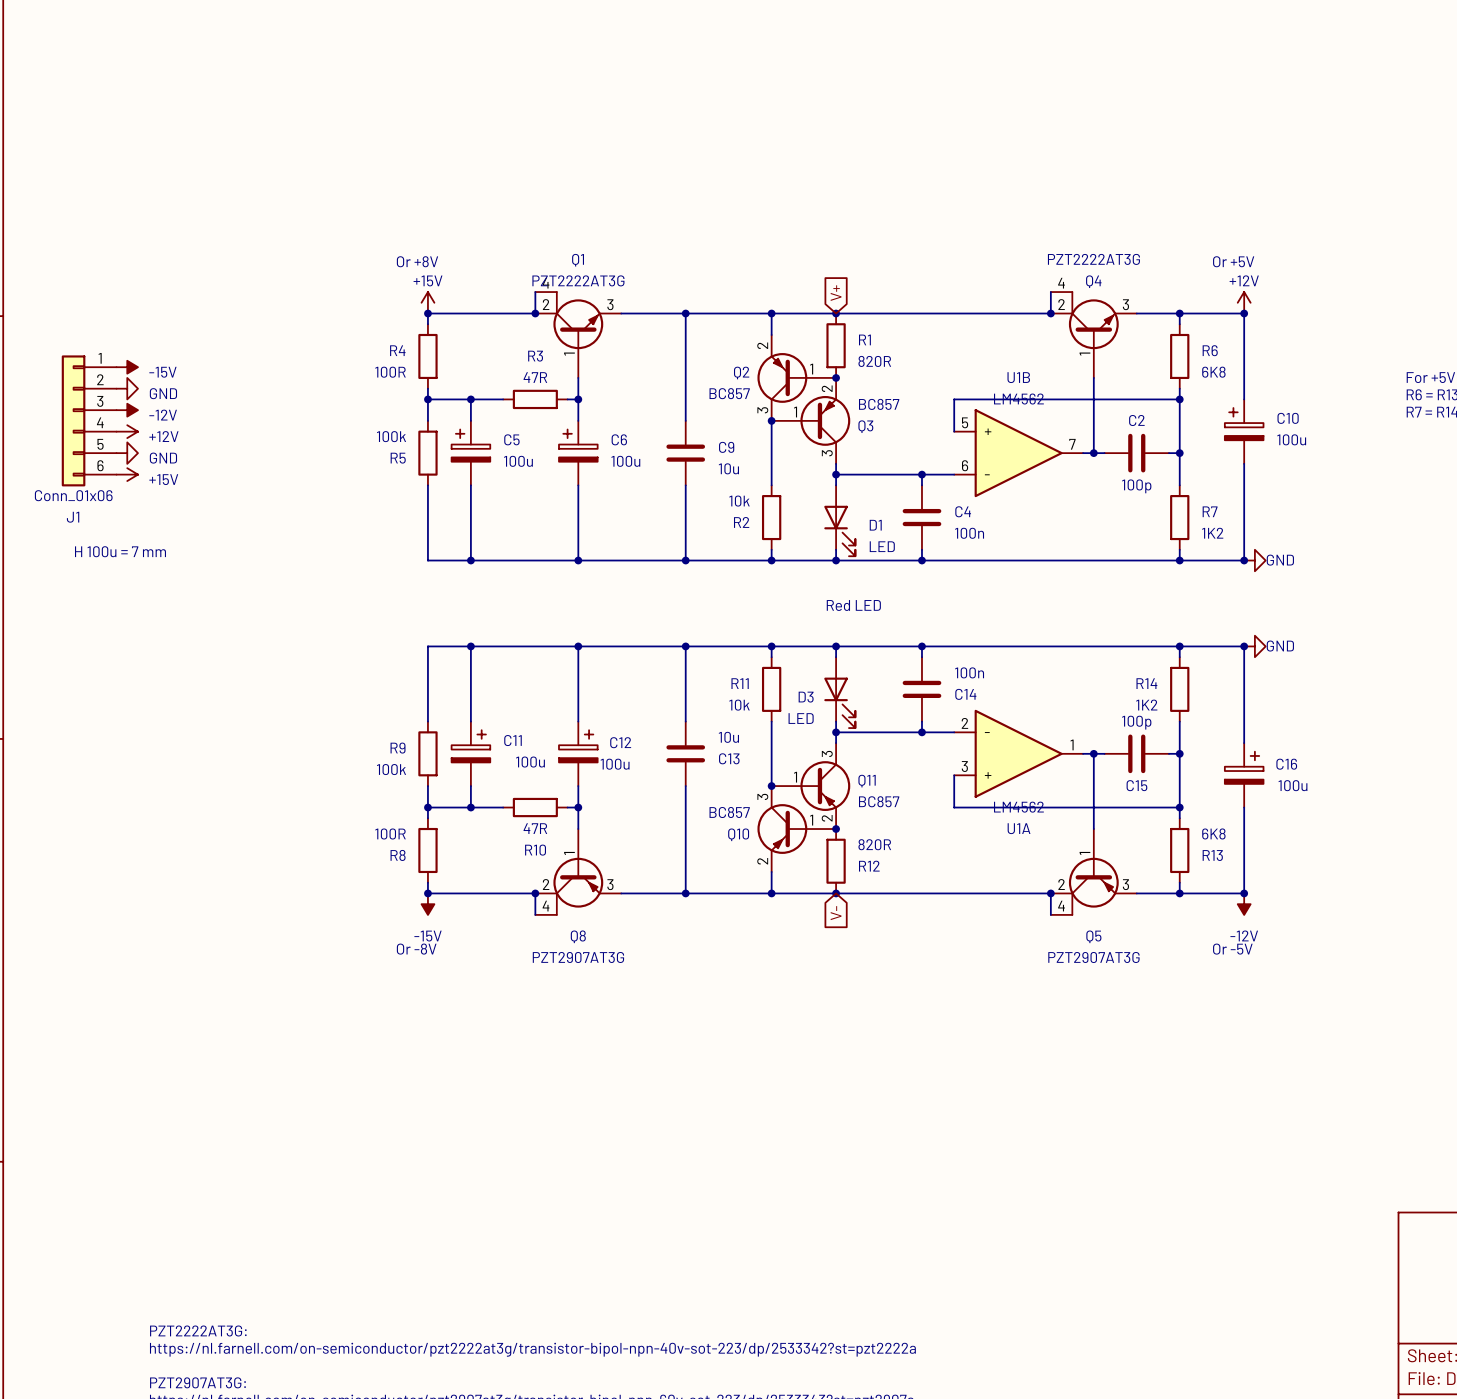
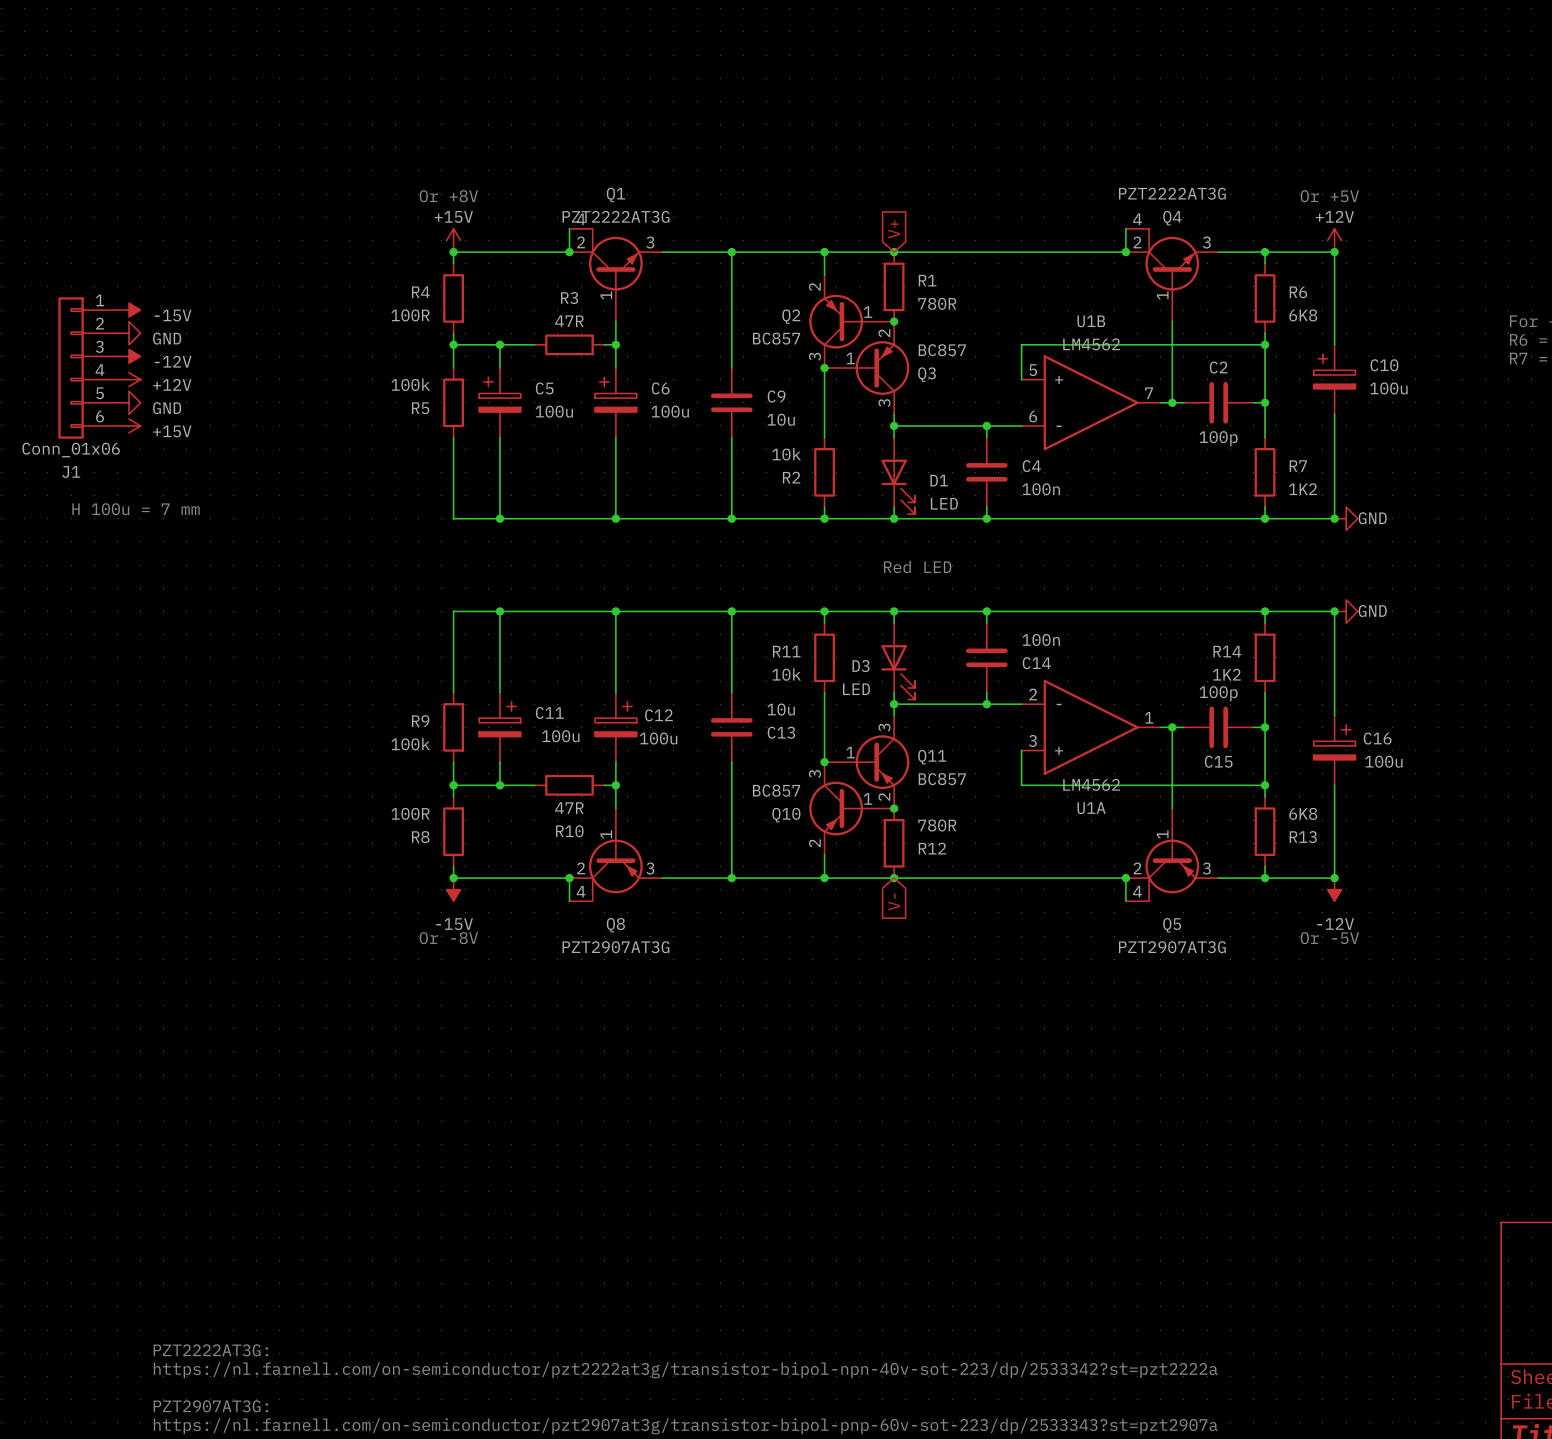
R1 value: 820R (874, 361) -> 780R (937, 303)
R12 value: 820R (874, 844) -> 780R (937, 825)

